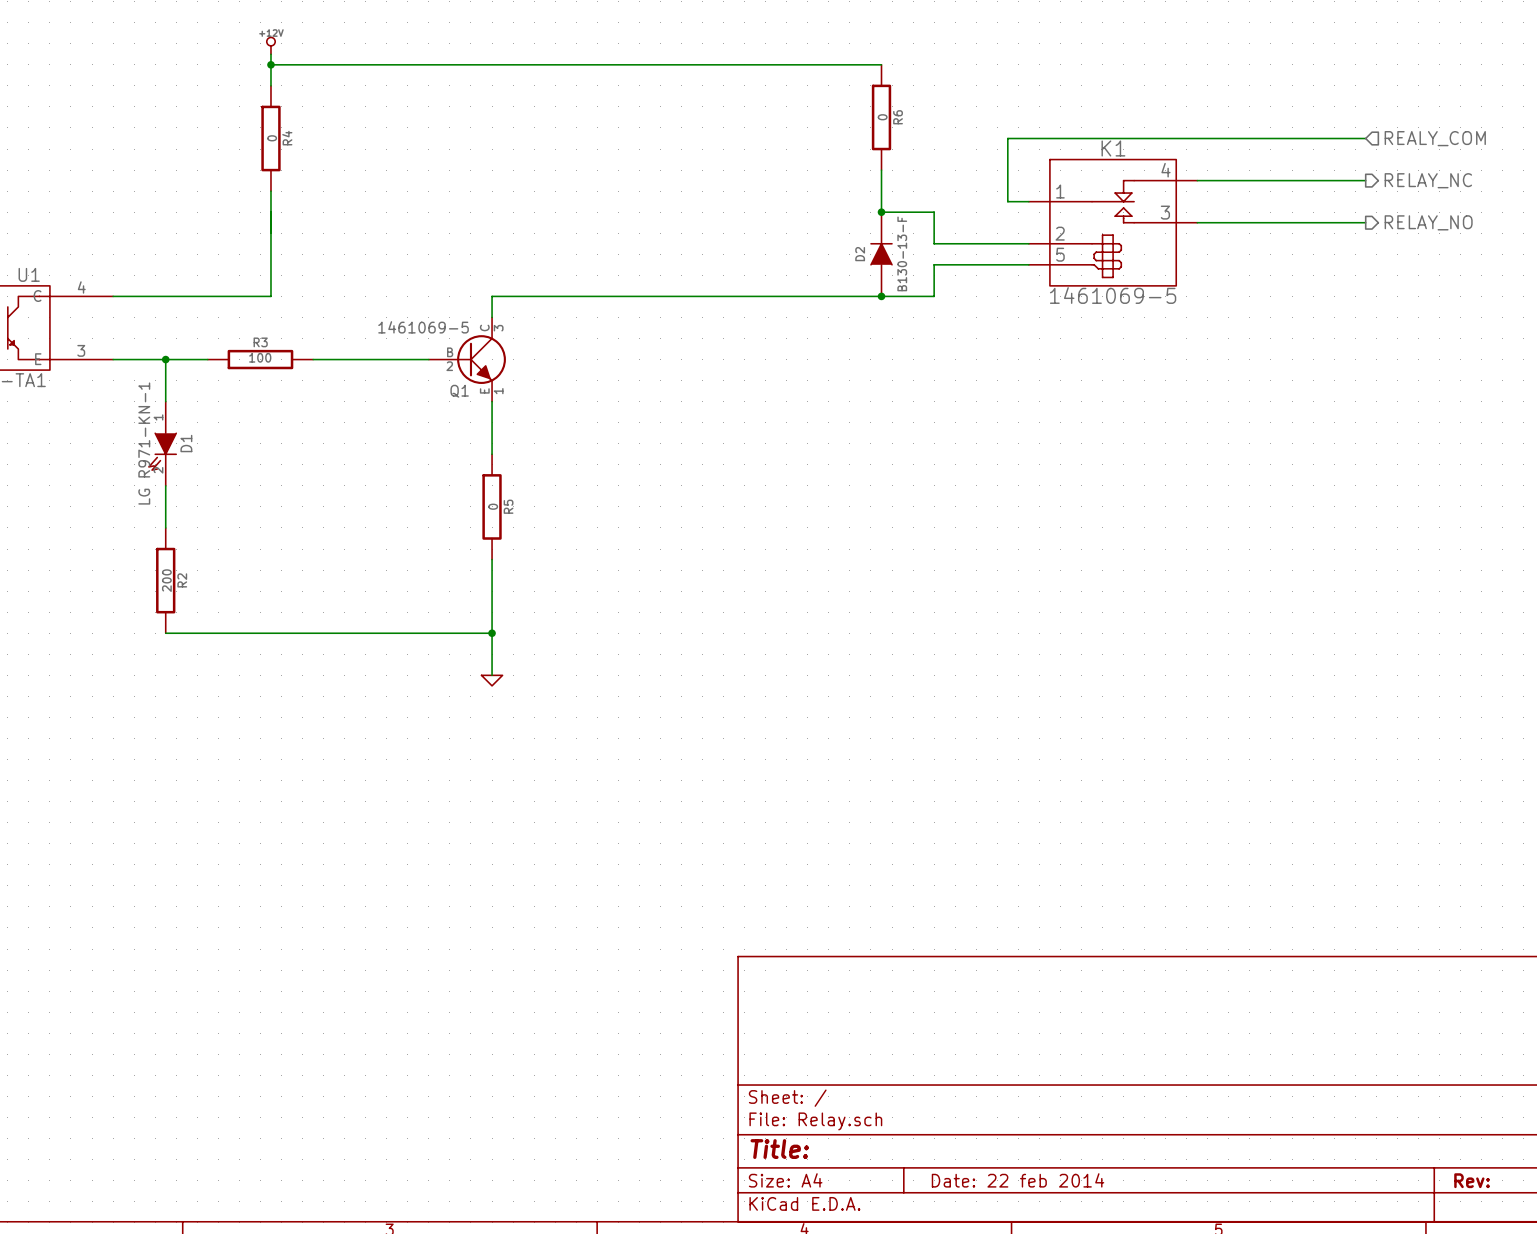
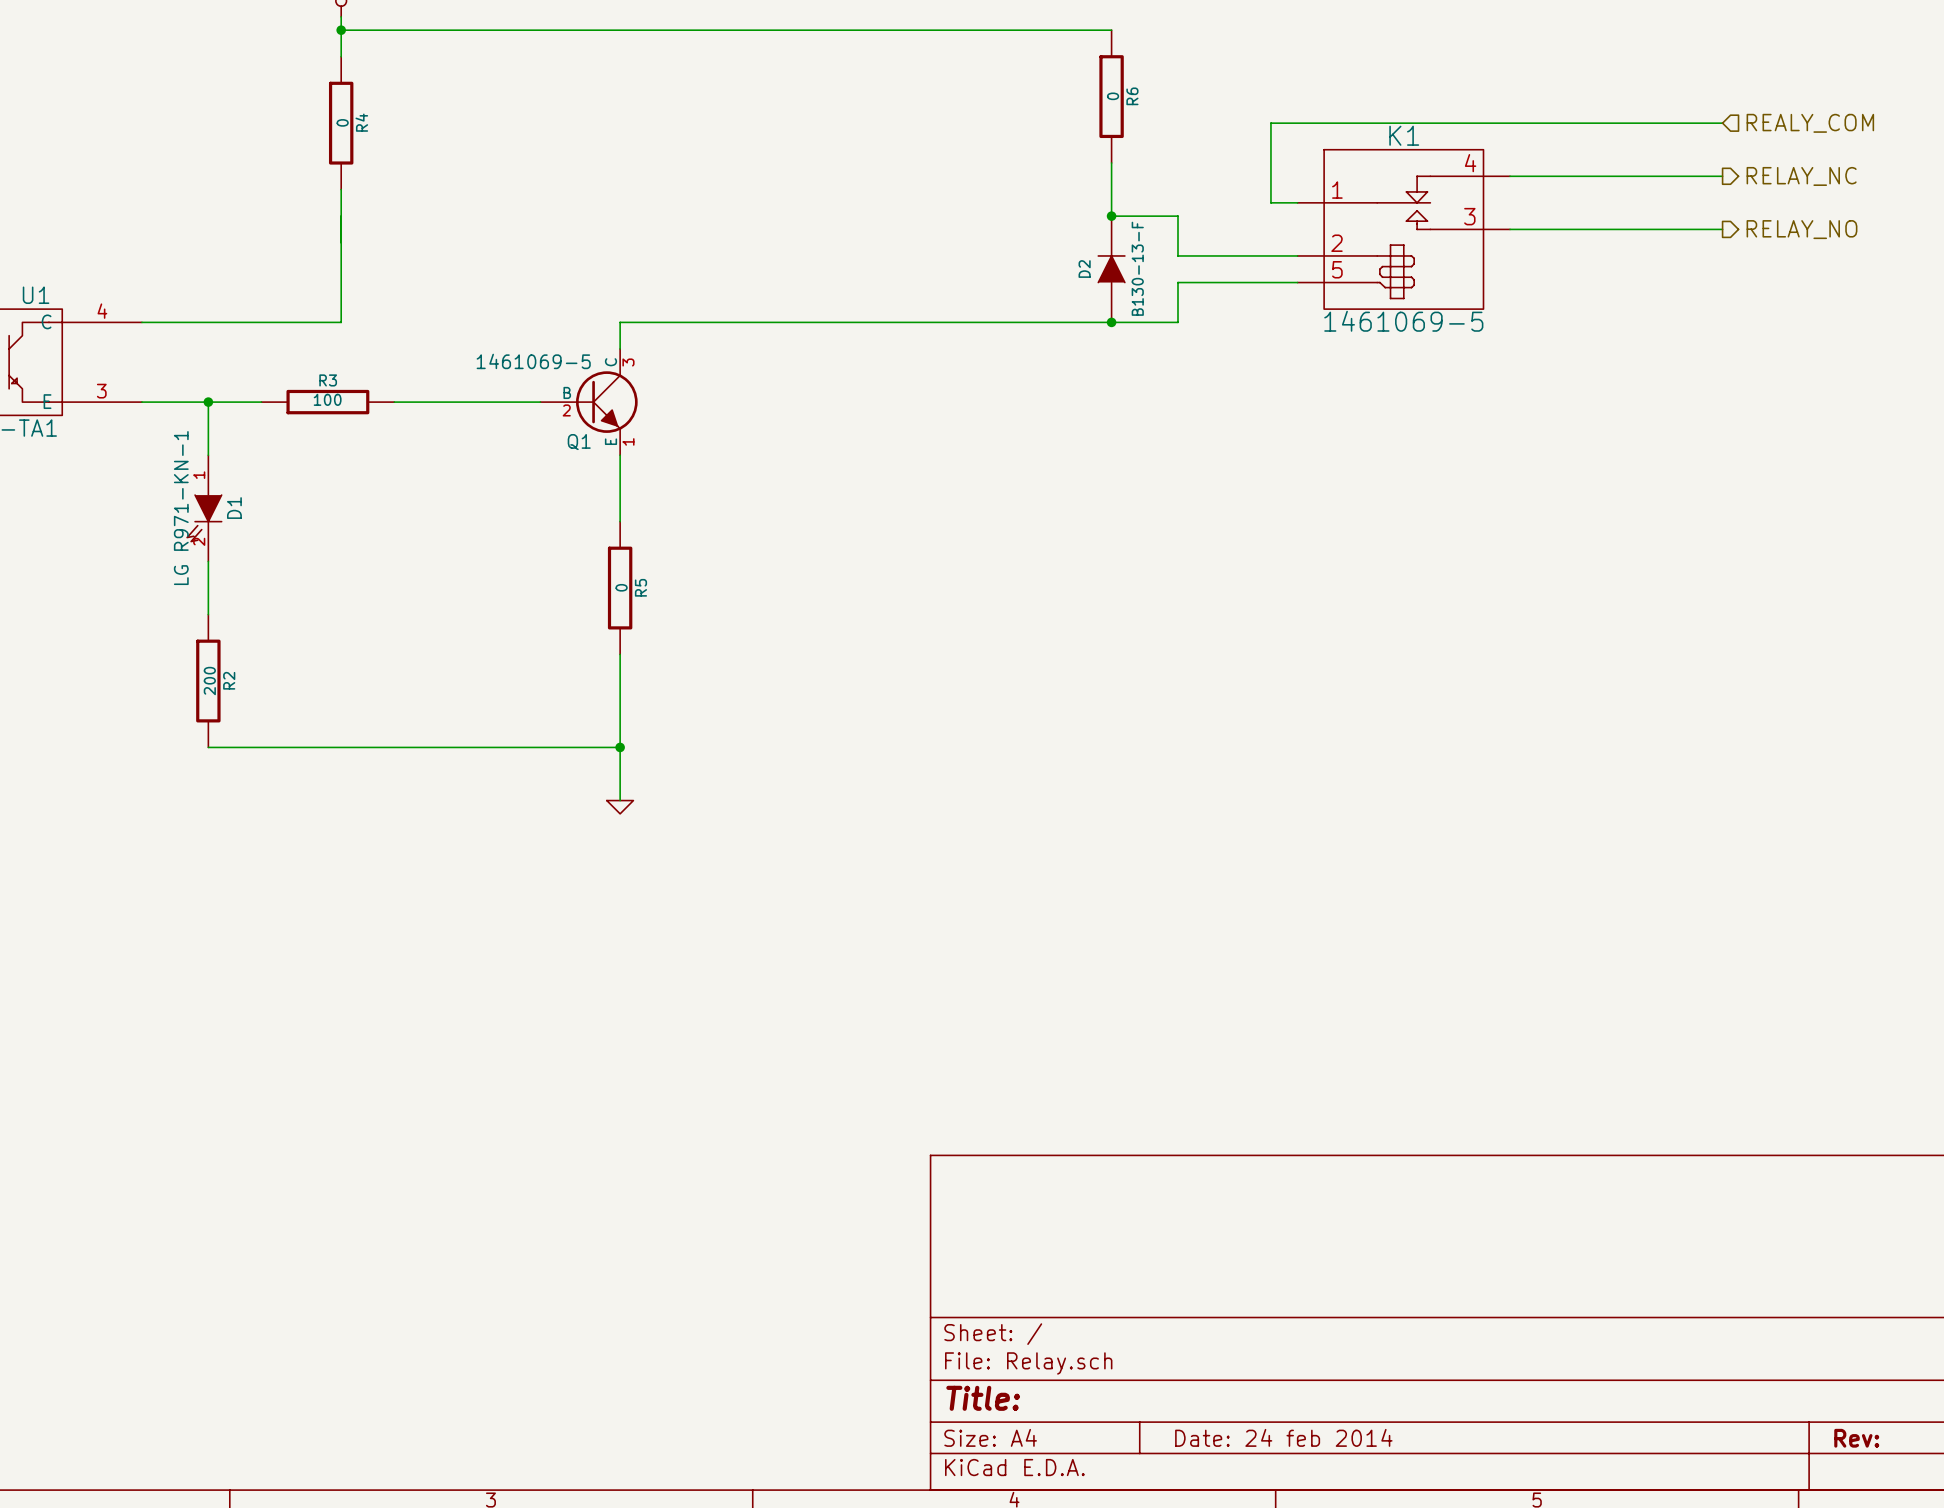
title block: Date: 22 feb 2014 (1018, 1180) -> Date: 24 feb 2014 (1283, 1437)

